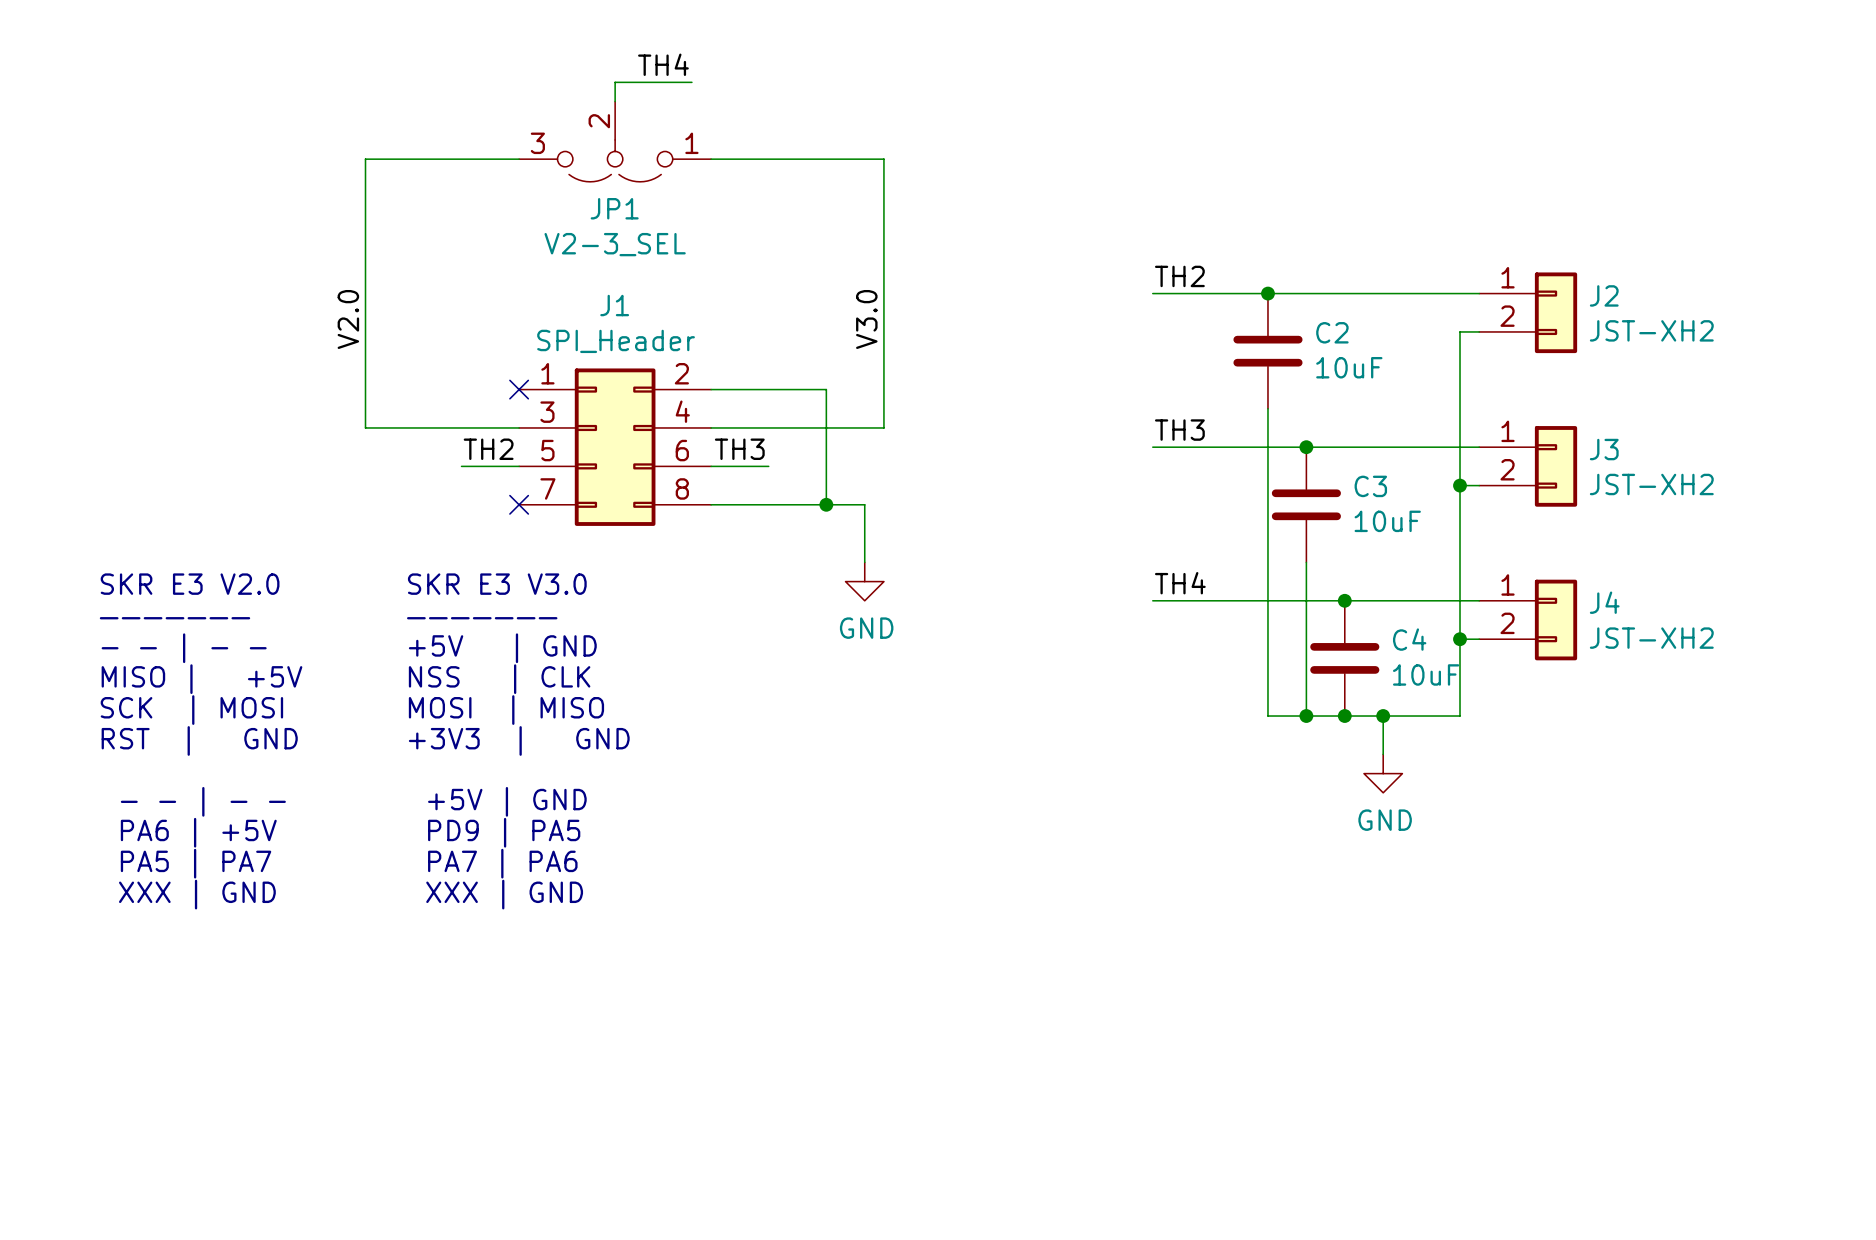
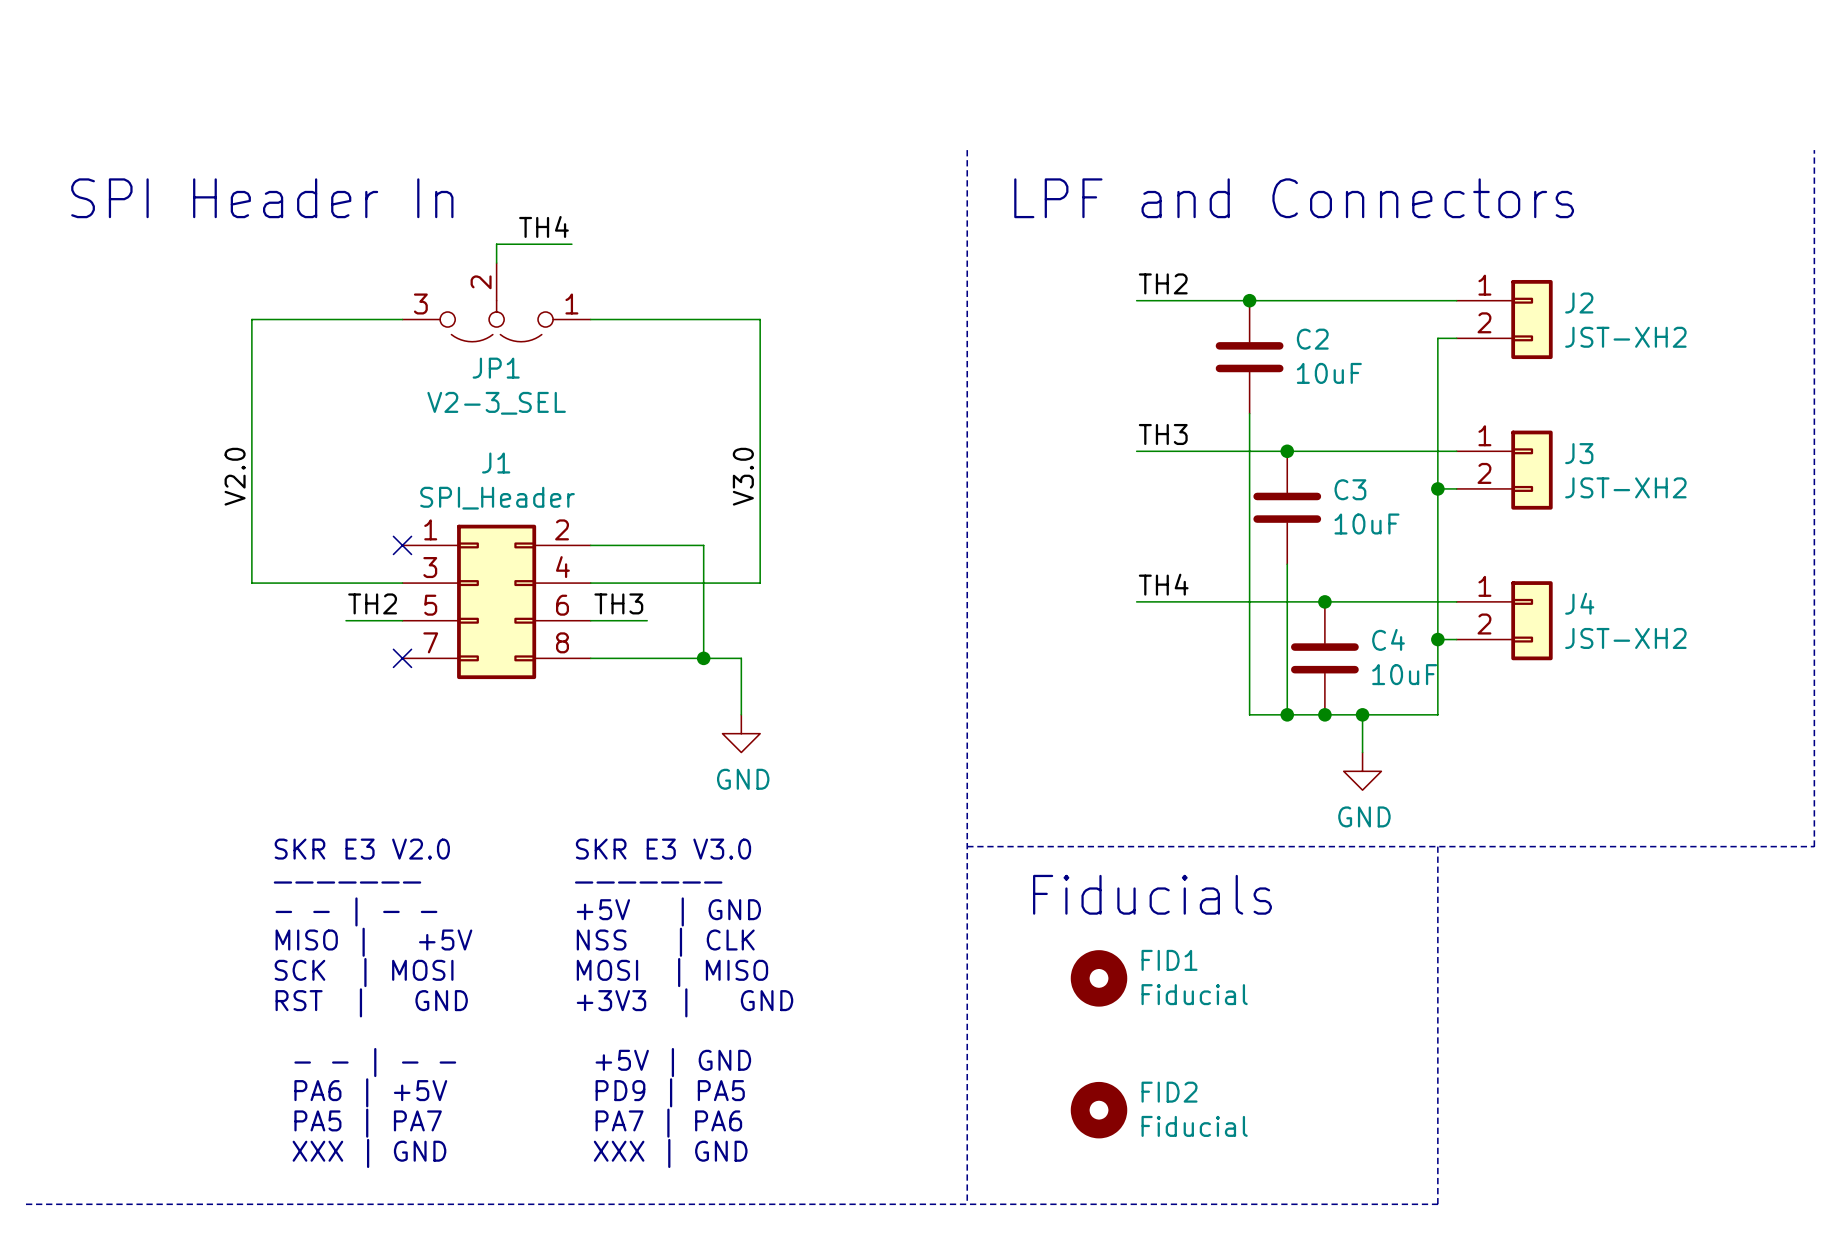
label position: TH4 (663, 64) -> TH4 (543, 226)
wire: (691, 82) (615, 82) (615, 101) -> (571, 244) (496, 244) (496, 263)
line: none -> (967, 150) (967, 1204)
line: none -> (1814, 150) (1814, 846) (967, 846)
JP1 position: (615, 141) -> (496, 302)
wire: (519, 159) (365, 159) (365, 427) (519, 427) -> (402, 319) (251, 319) (251, 583) (402, 583)
wire: (711, 159) (883, 159) (883, 427) (711, 427) -> (590, 319) (760, 319) (760, 583) (590, 583)
text: none -> SPI Header In (262, 198)
text: none -> LPF and Connectors (1294, 198)
label position: V2.0 (348, 319) -> V2.0 (235, 476)
label position: V3.0 (866, 319) -> V3.0 (743, 476)
no-connect mark: (519, 389) -> none
wire: (711, 389) (826, 389) (826, 504) -> (590, 545) (703, 545) (703, 658)
J1 position: (615, 447) -> (496, 601)
label position: TH2 (488, 449) -> TH2 (372, 603)
label position: TH3 (739, 449) -> TH3 (618, 603)
wire: (461, 466) (519, 466) -> (346, 620) (402, 620)
wire: (711, 466) (768, 466) -> (590, 620) (647, 620)
no-connect mark: (519, 504) -> none
wire: (711, 504) (864, 504) (864, 562) -> (590, 658) (741, 658) (741, 714)
junction: (826, 504) -> none
no-connect mark: none -> (402, 545)
power symbol position: GND (864, 581) -> GND (741, 733)
text position: SKR E3 V2.0 (190, 584) -> SKR E3 V2.0 (362, 849)
text position: SKR E3 V3.0 (497, 584) -> SKR E3 V3.0 (663, 849)
text: ——————— (175, 618) -> none
text: ——————— (482, 618) -> none
text: - - | - - (184, 648) -> none
text: +5V | GND (502, 648) -> none
no-connect mark: none -> (402, 658)
junction: none -> (703, 658)
text position: MISO | +5V (201, 679) -> MISO | +5V (373, 942)
text position: NSS | CLK (499, 679) -> NSS | CLK (665, 942)
text position: SCK | MOSI (191, 710) -> SCK | MOSI (364, 972)
text position: MOSI | MISO (506, 710) -> MOSI | MISO (672, 972)
text position: RST | GND (199, 740) -> RST | GND (371, 1002)
text position: +3V3 | GND (519, 740) -> +3V3 | GND (685, 1002)
text: - - | - - (203, 801) -> none
text: +5V | GND (507, 801) -> none
text position: PA6 | +5V (198, 832) -> PA6 | +5V (370, 1092)
text position: PD9 | PA5 (504, 832) -> PD9 | PA5 (670, 1092)
line: none -> (1437, 846) (1437, 1204) (25, 1204)
text position: PA5 | PA7 (196, 863) -> PA5 | PA7 (368, 1123)
text position: PA7 | PA6 (502, 863) -> PA7 | PA6 (668, 1123)
text: none -> ——————— (347, 882)
text: none -> ——————— (648, 882)
text: XXX | GND (197, 894) -> none
text: XXX | GND (504, 894) -> none
text: none -> Fiducials (1152, 894)
text: none -> - - | - - (356, 911)
text: none -> +5V | GND (668, 911)
FID1: none -> Fiducial (1099, 978)
text: none -> - - | - - (375, 1062)
text: none -> +5V | GND (673, 1062)
FID2: none -> Fiducial (1099, 1110)
text: none -> XXX | GND (369, 1153)
text: none -> XXX | GND (670, 1153)

